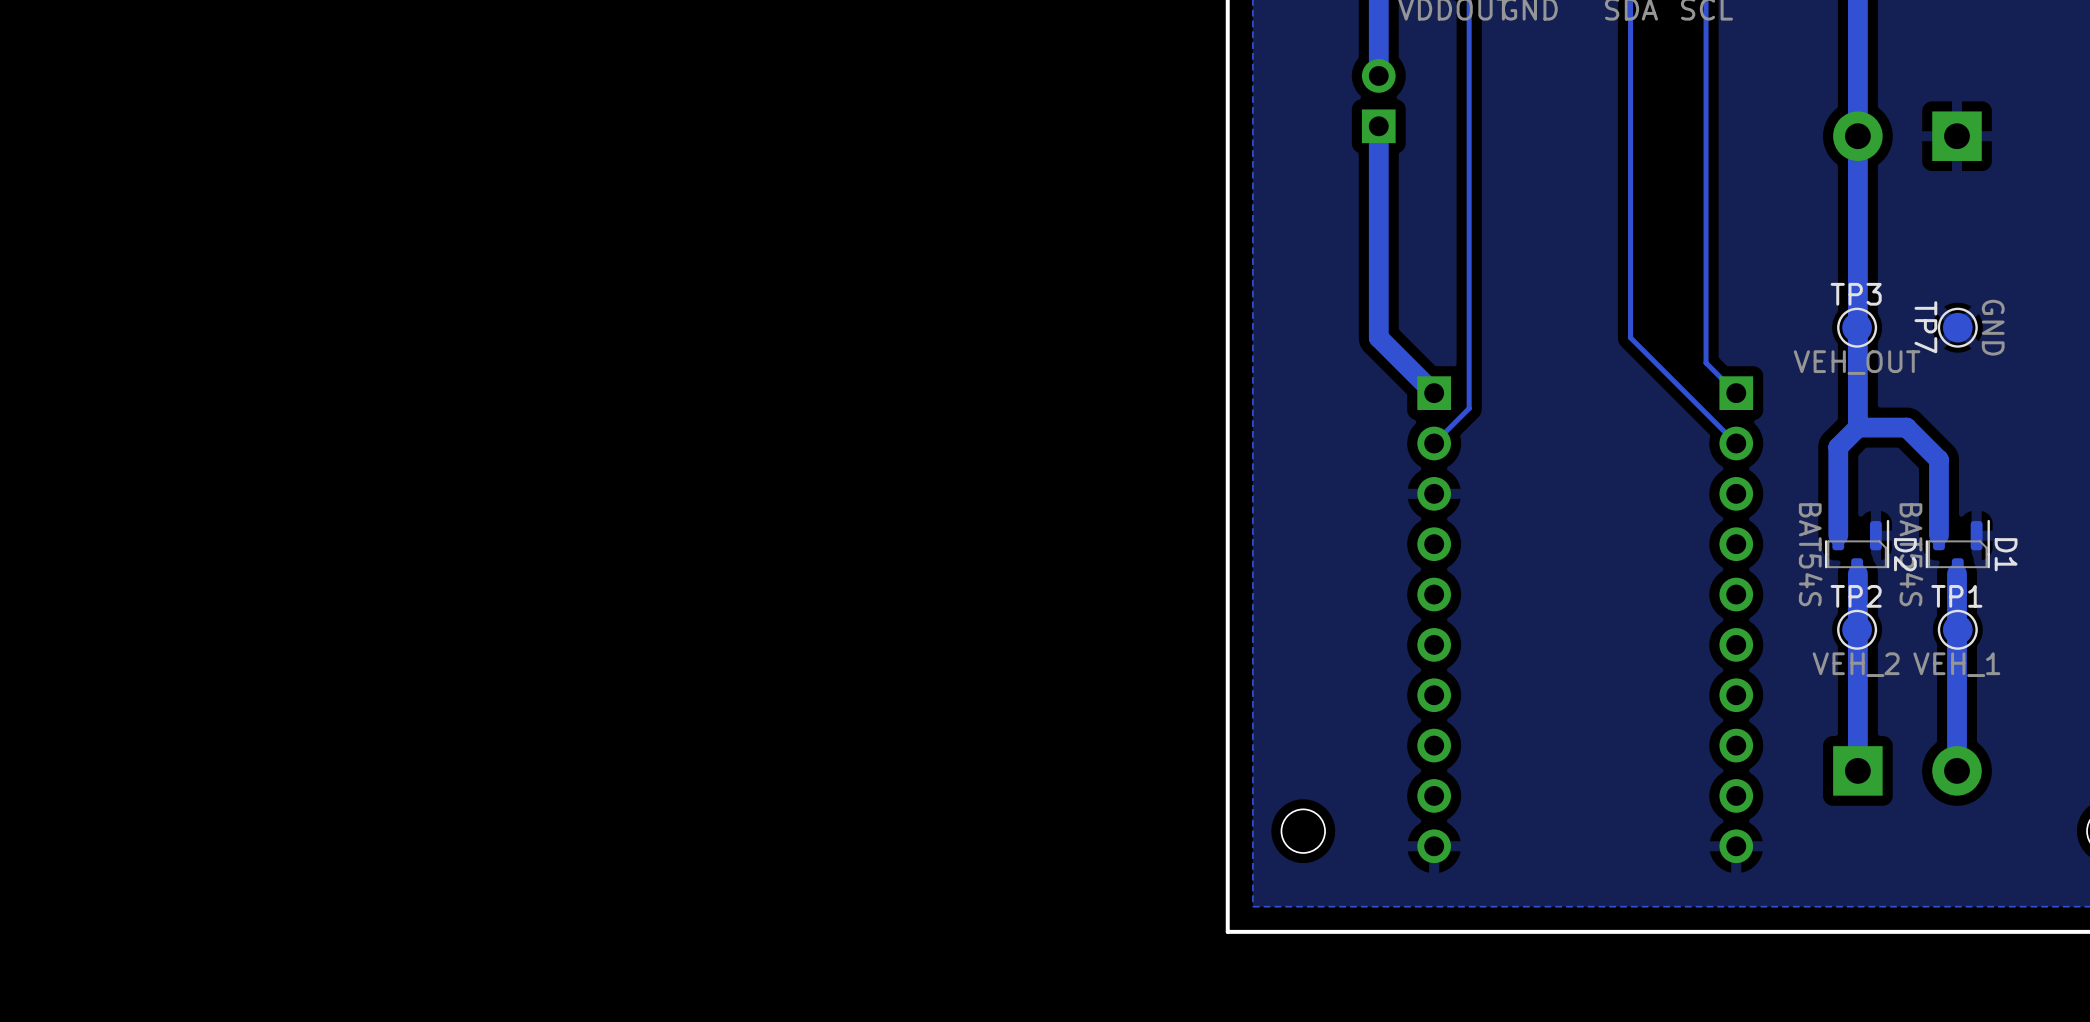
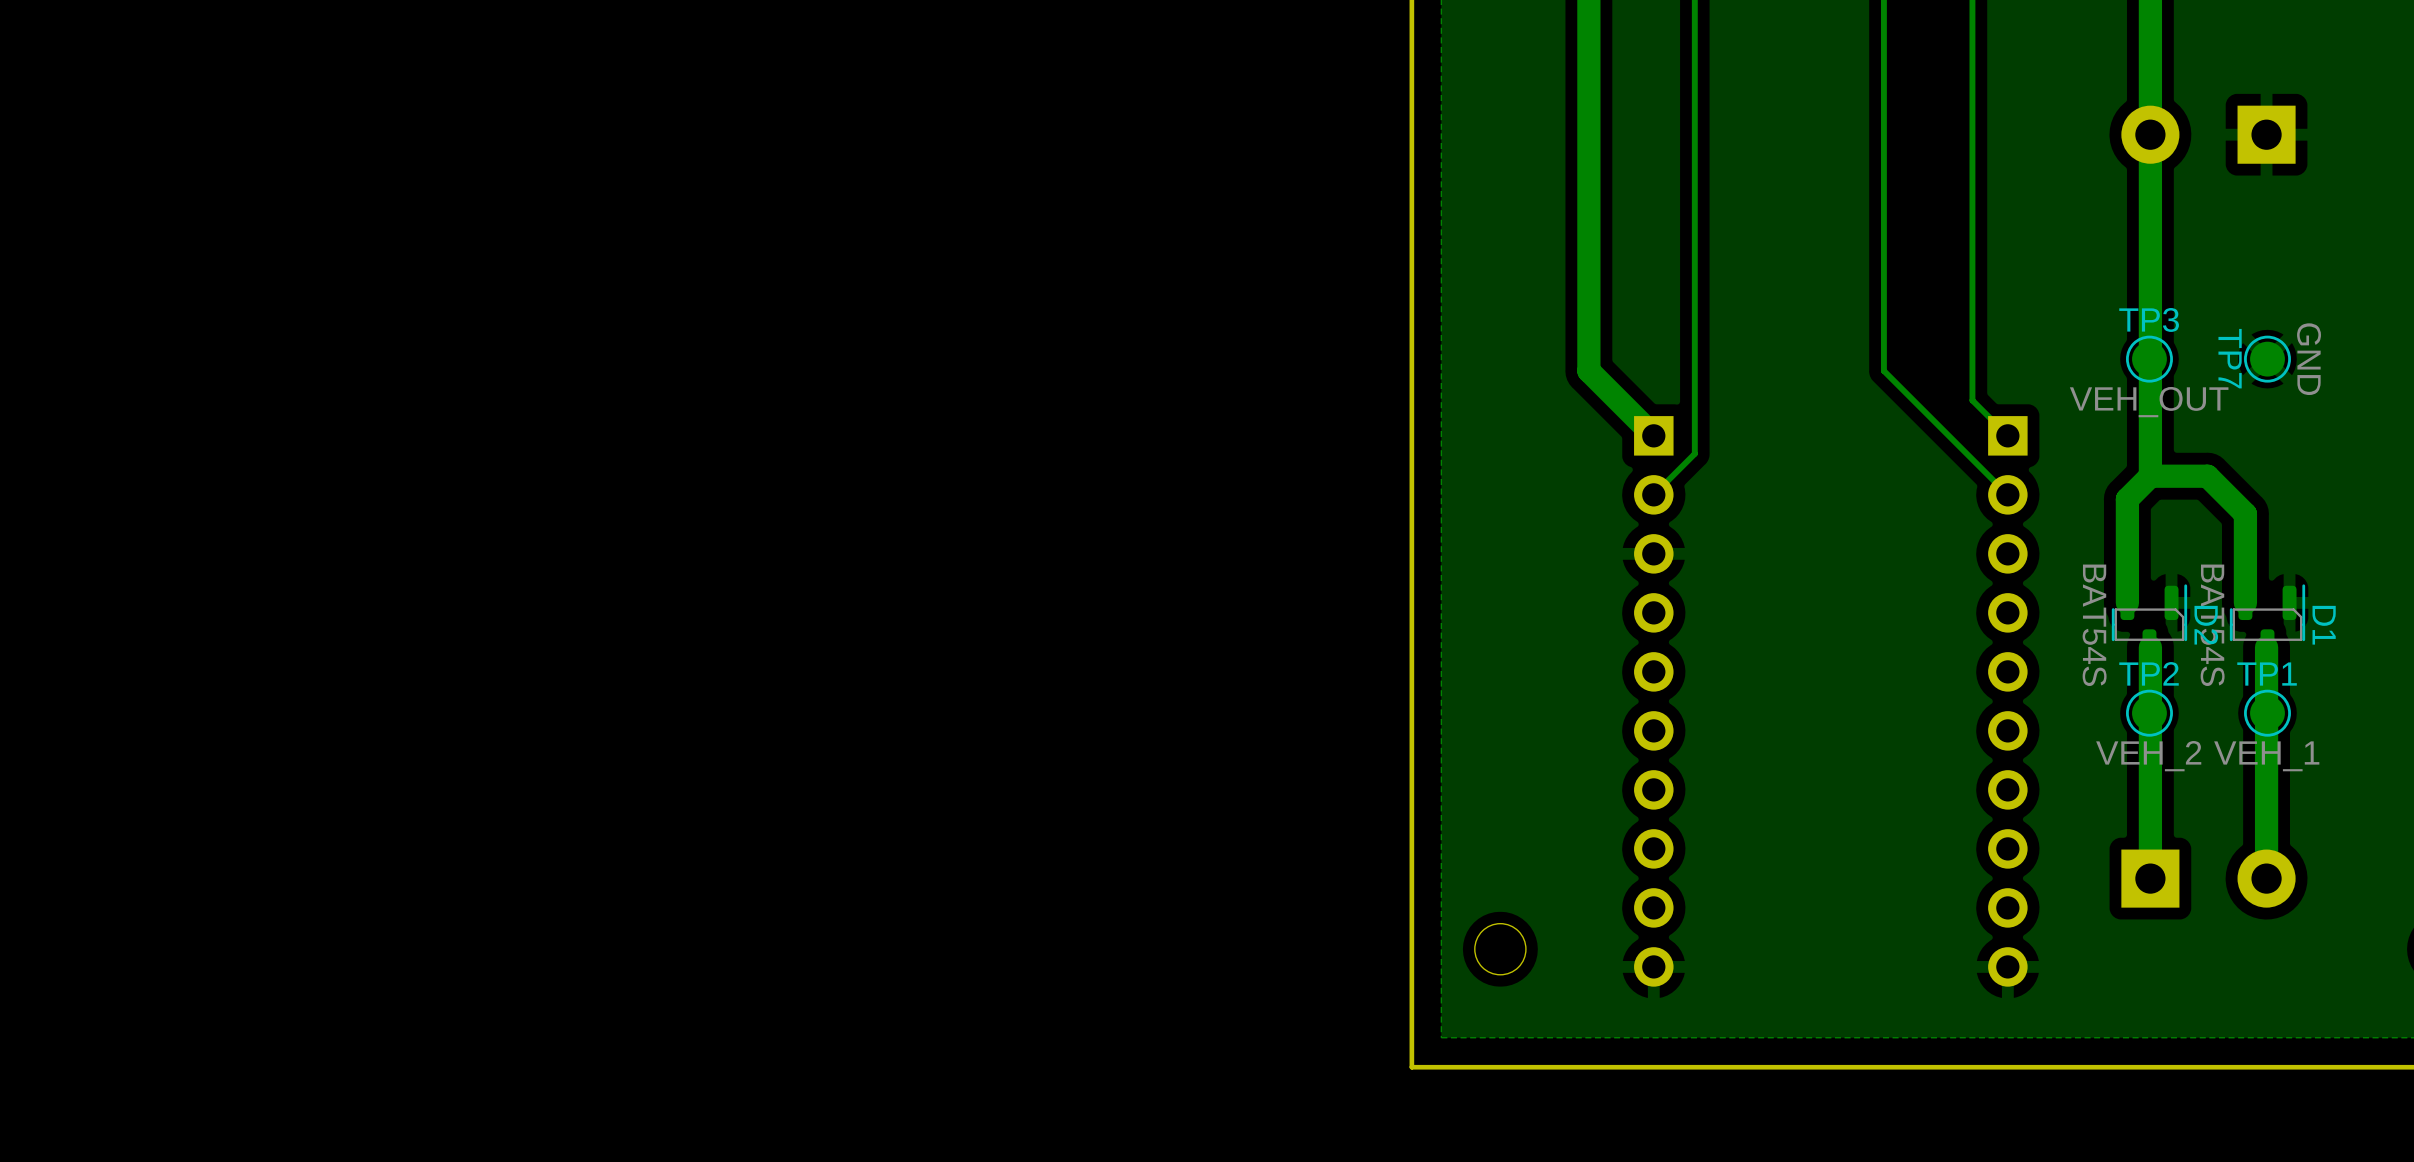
track: none -> (1588, 64) (1588, 123)
part: (1378, 101) -> none

